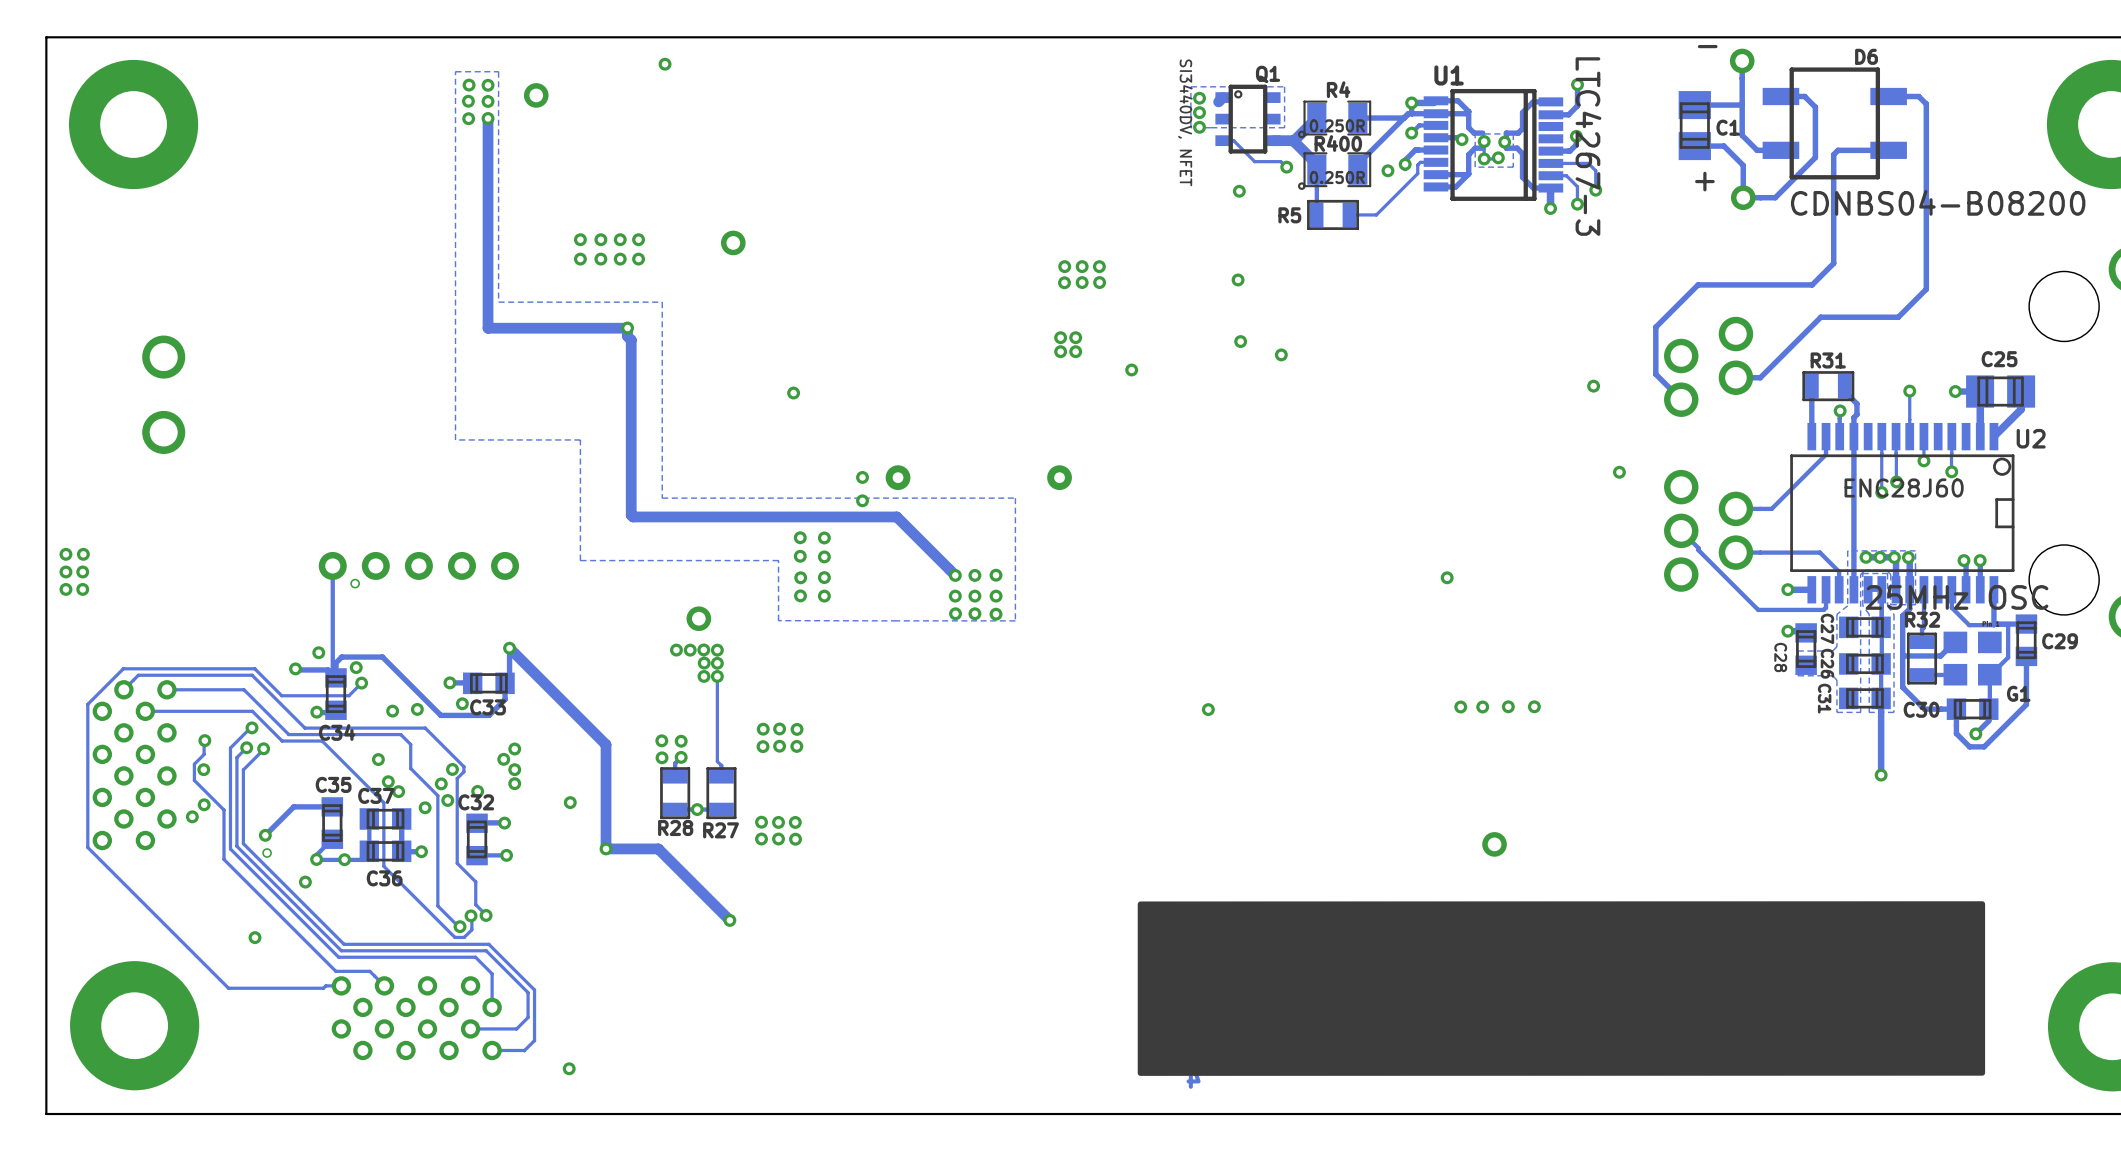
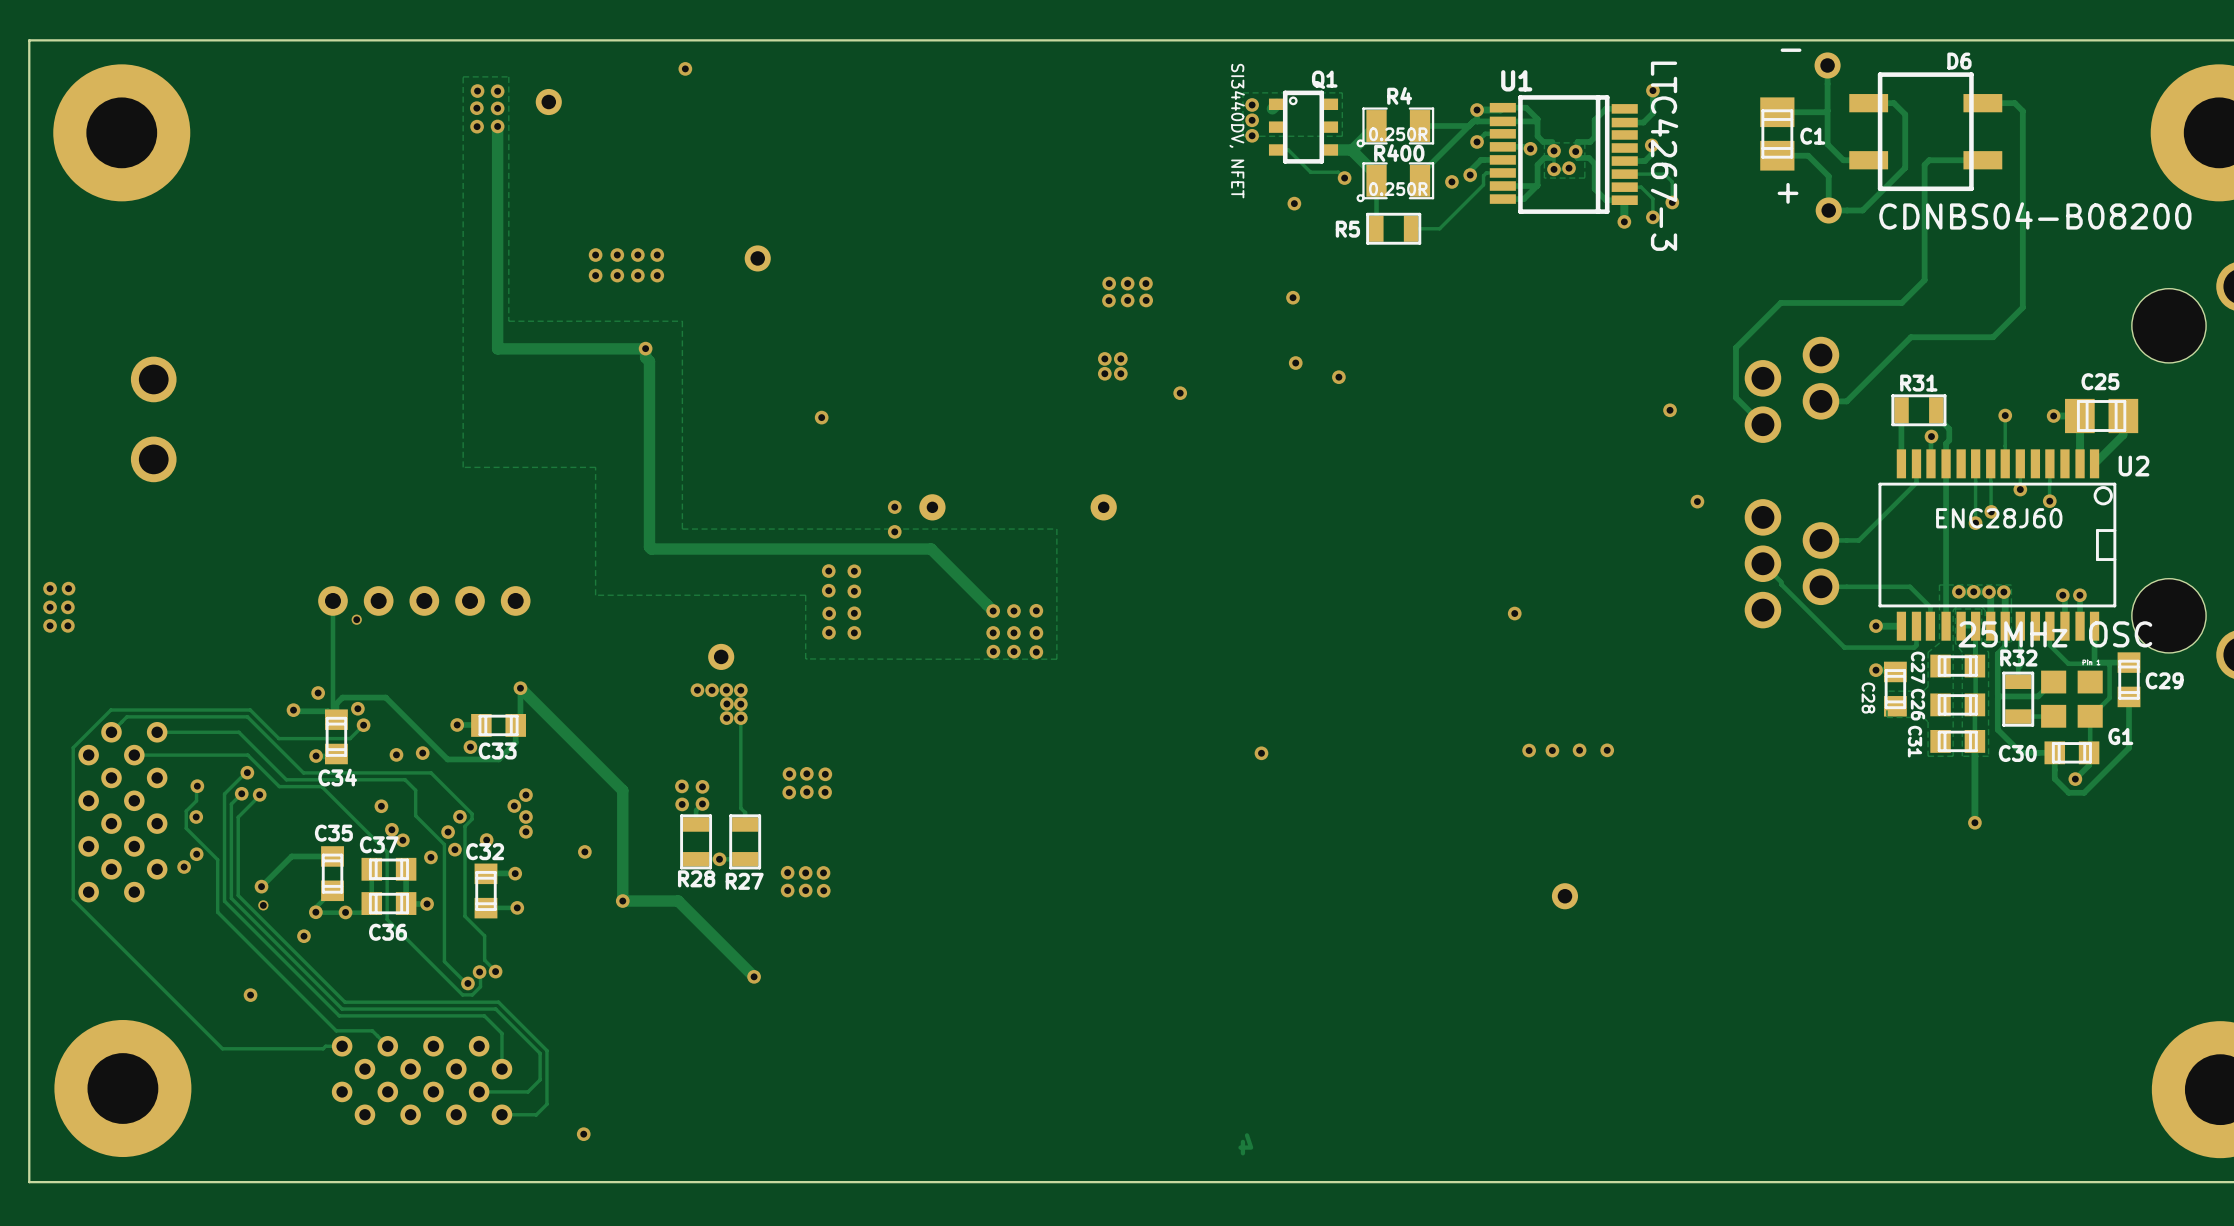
drawing: [1137, 901, 1986, 1076] -> none

